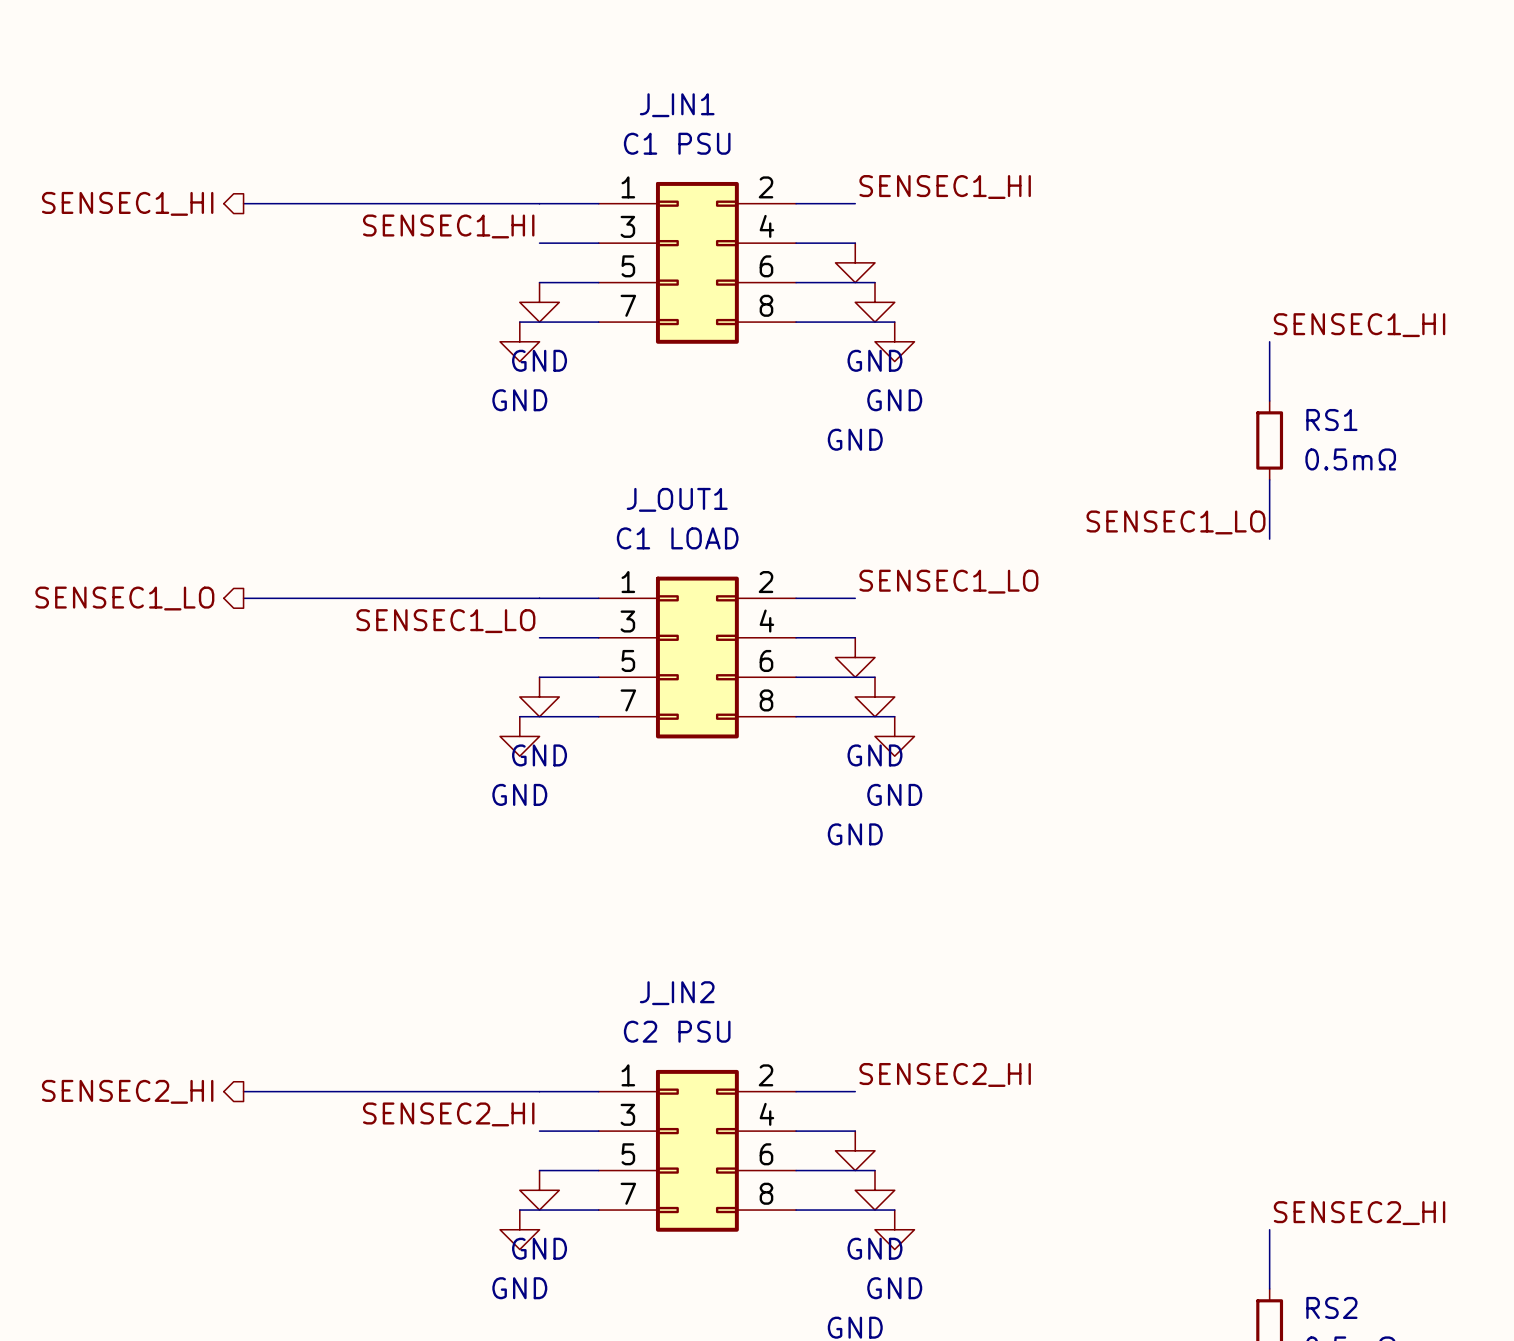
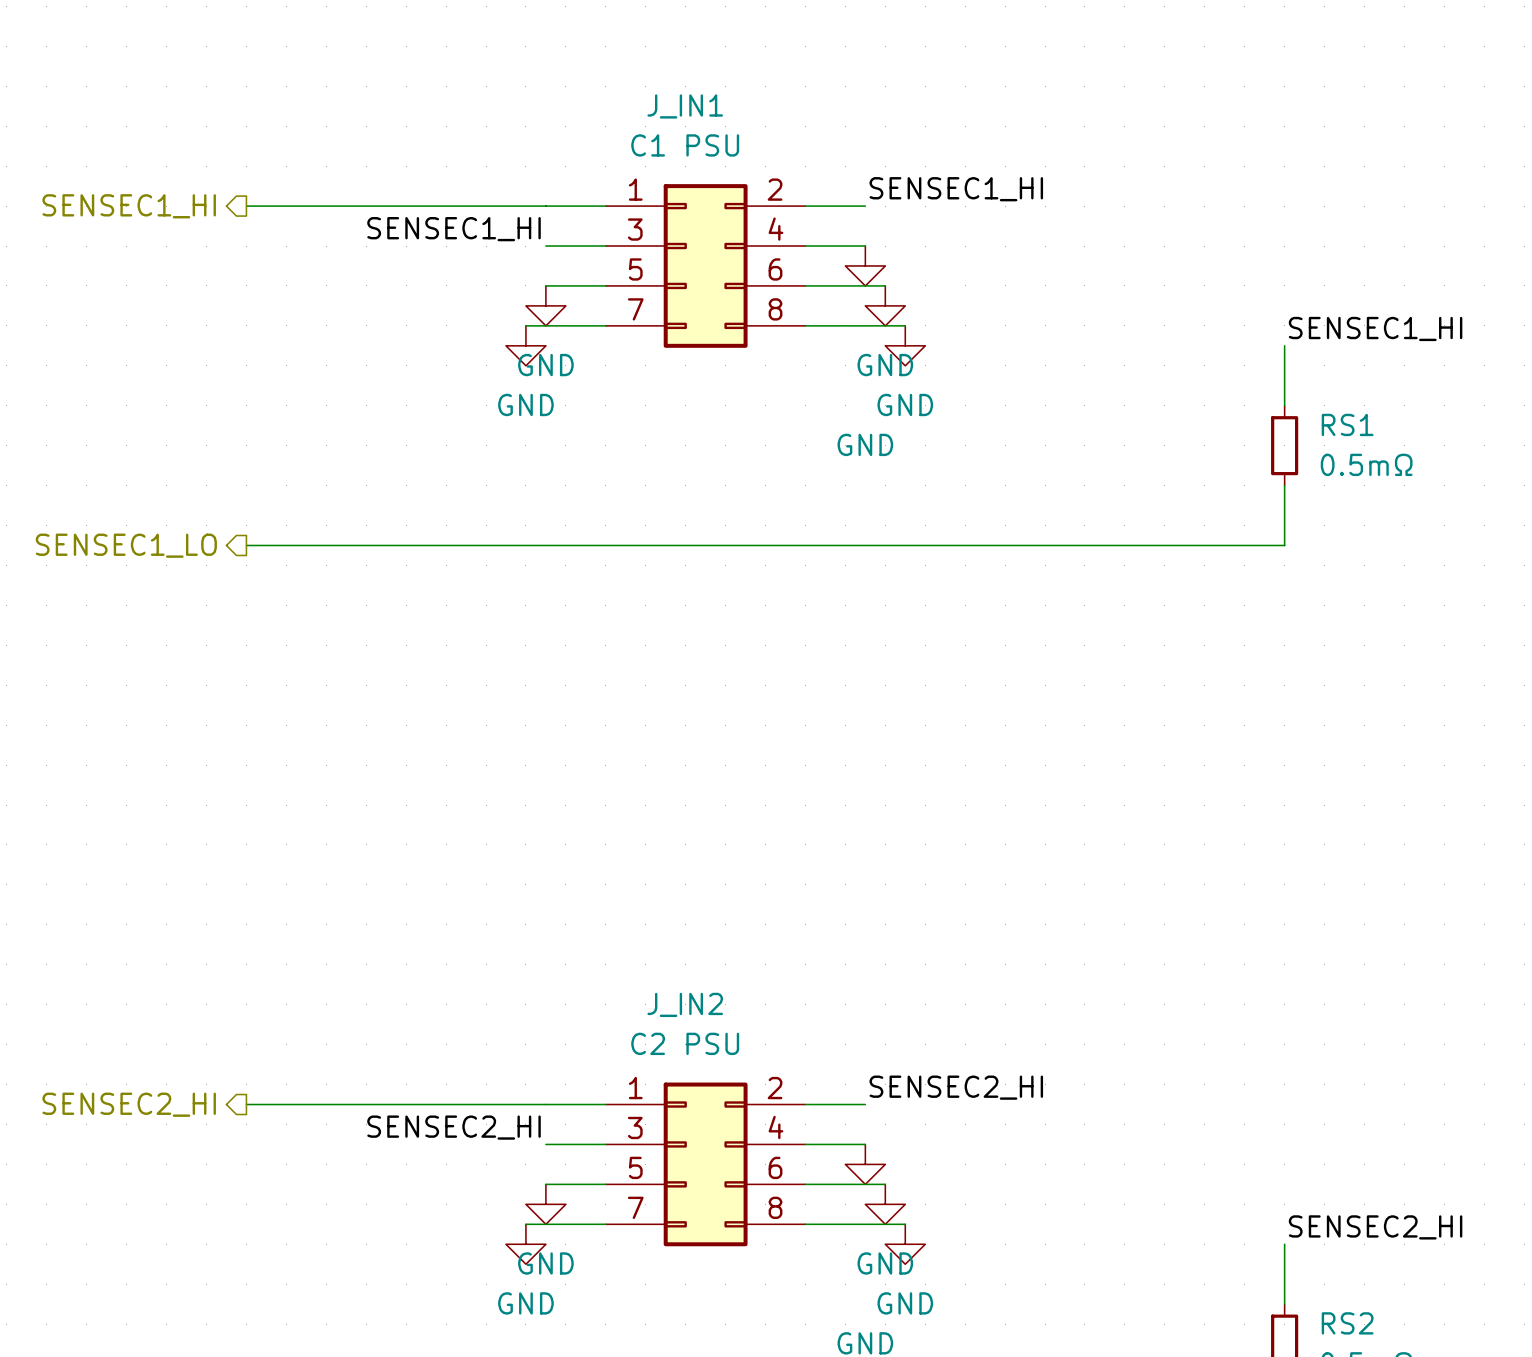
label: SENSEC1_LO (1176, 522) -> none
wire: none -> (246, 545) (1284, 545)
label: SENSEC1_LO (948, 581) -> none
hierarchical label position: SENSEC1_LO (124, 598) -> SENSEC1_LO (126, 545)
wire: (243, 598) (598, 598) -> none
wire: (796, 598) (855, 598) -> none
label: SENSEC1_LO (445, 621) -> none
wire: (539, 637) (598, 637) -> none
wire: (796, 637) (855, 637) -> none
J_OUT1: C1 LOAD (697, 657) -> none
power symbol: GND (855, 657) -> none
wire: (539, 677) (598, 677) -> none
wire: (796, 677) (874, 677) -> none
power symbol: GND (539, 696) -> none
power symbol: GND (874, 696) -> none
wire: (519, 716) (598, 716) -> none
wire: (796, 716) (894, 716) -> none
power symbol: GND (519, 736) -> none
power symbol: GND (894, 736) -> none

